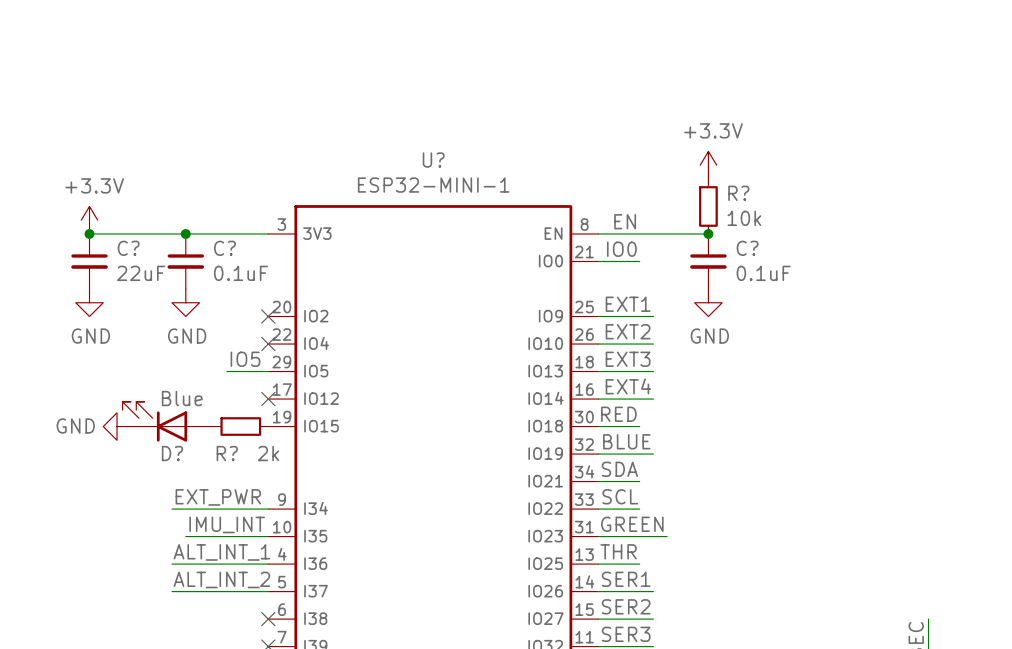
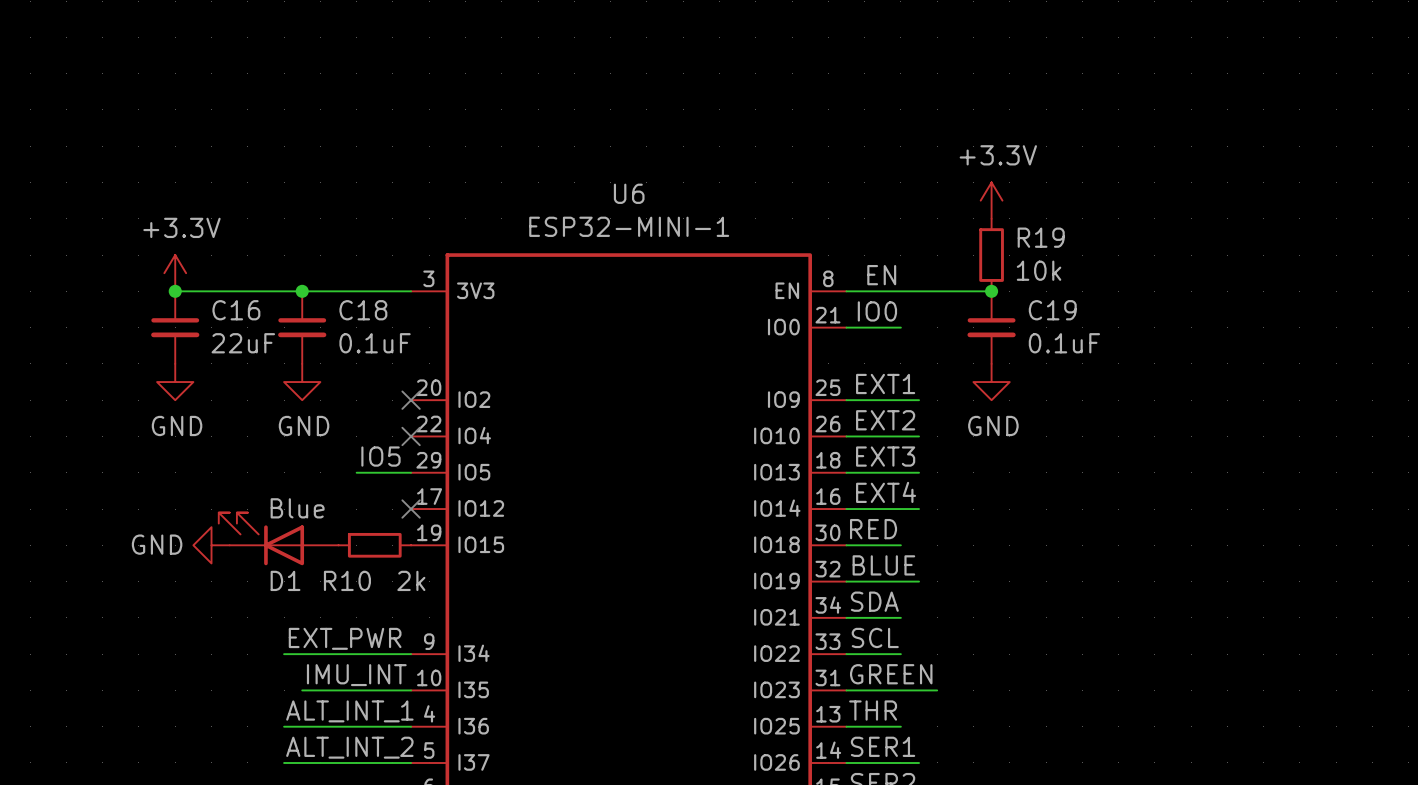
U? name: U? (433, 160) -> U6 (629, 193)
R? name: R? (738, 193) -> R19 (1041, 237)
C? name: C? (128, 248) -> C16 (236, 310)
C? name: C? (224, 248) -> C18 (363, 310)
C? name: C? (747, 248) -> C19 (1052, 310)
D? name: D? (172, 453) -> D1 (285, 580)
R? name: R? (227, 453) -> R10 (347, 580)

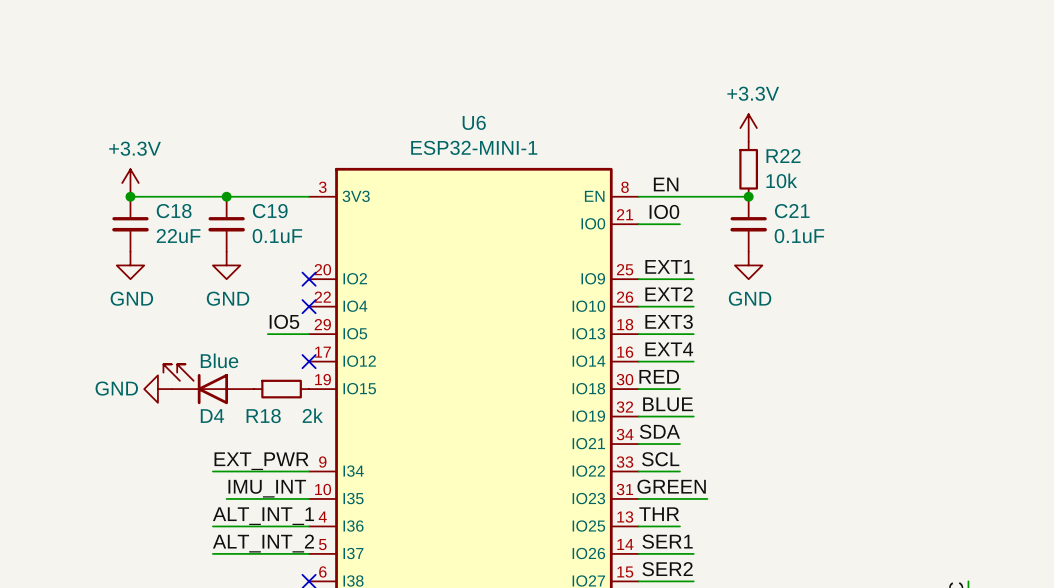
R19 name: R19 (1041, 237) -> R22 (783, 156)
C16 name: C16 (236, 310) -> C18 (174, 211)
C18 name: C18 (363, 310) -> C19 (270, 211)
C19 name: C19 (1052, 310) -> C21 (792, 211)
D1 name: D1 (285, 580) -> D4 (212, 416)
R10 name: R10 (347, 580) -> R18 (263, 416)

